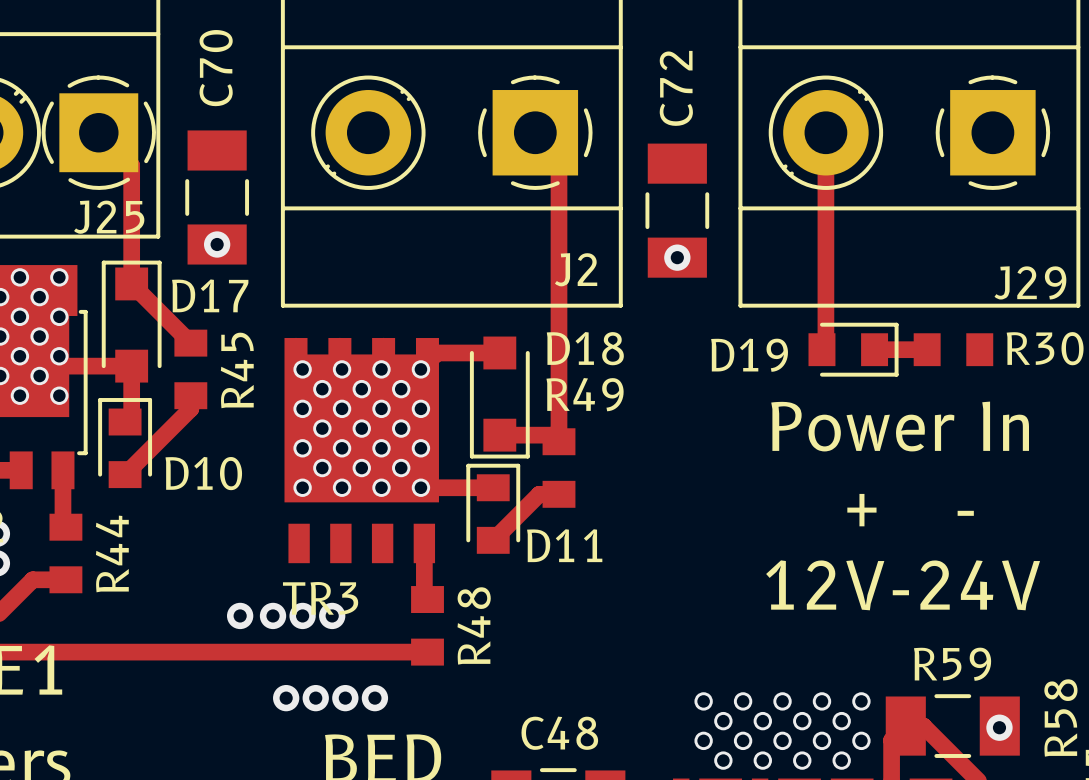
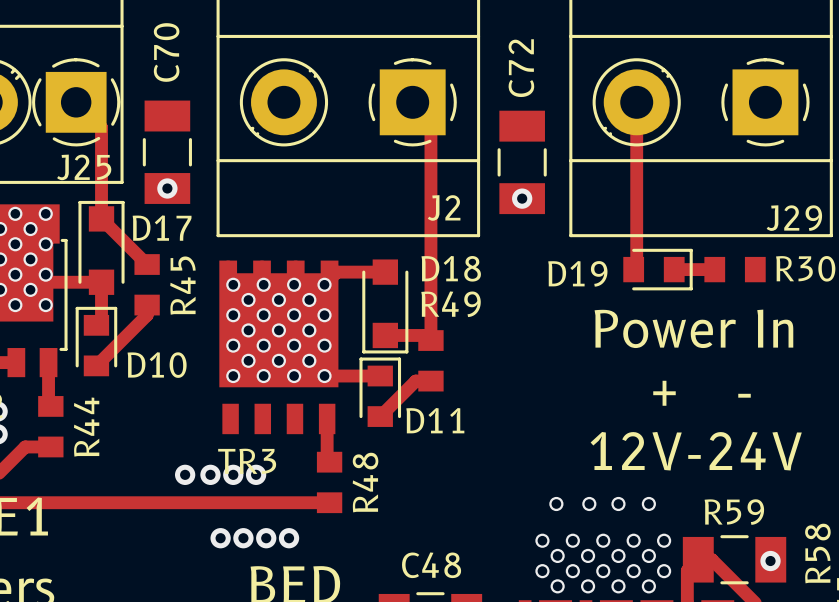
via: none -> (556, 503)
via: none -> (589, 503)
via: none -> (618, 503)
via: none -> (648, 503)

